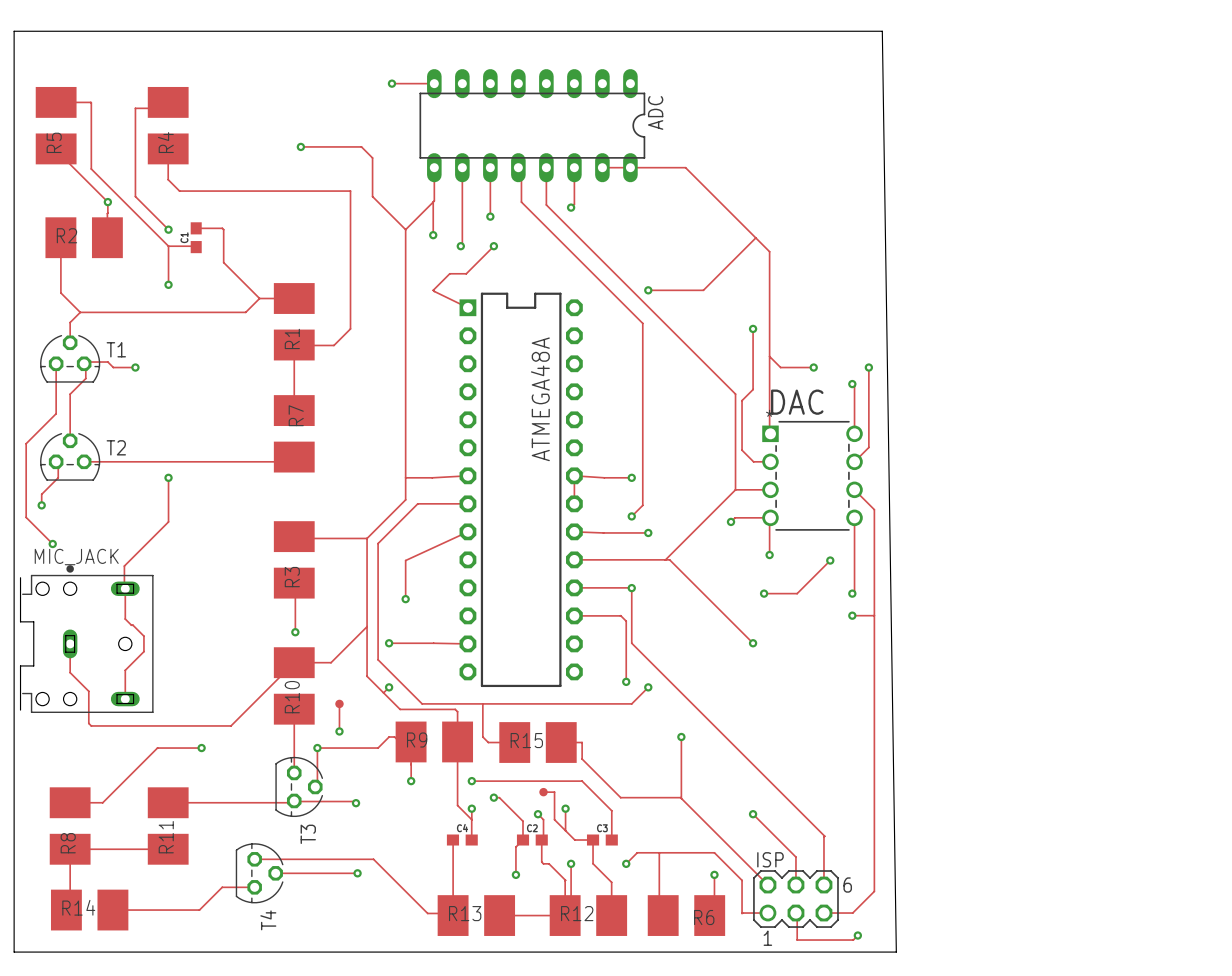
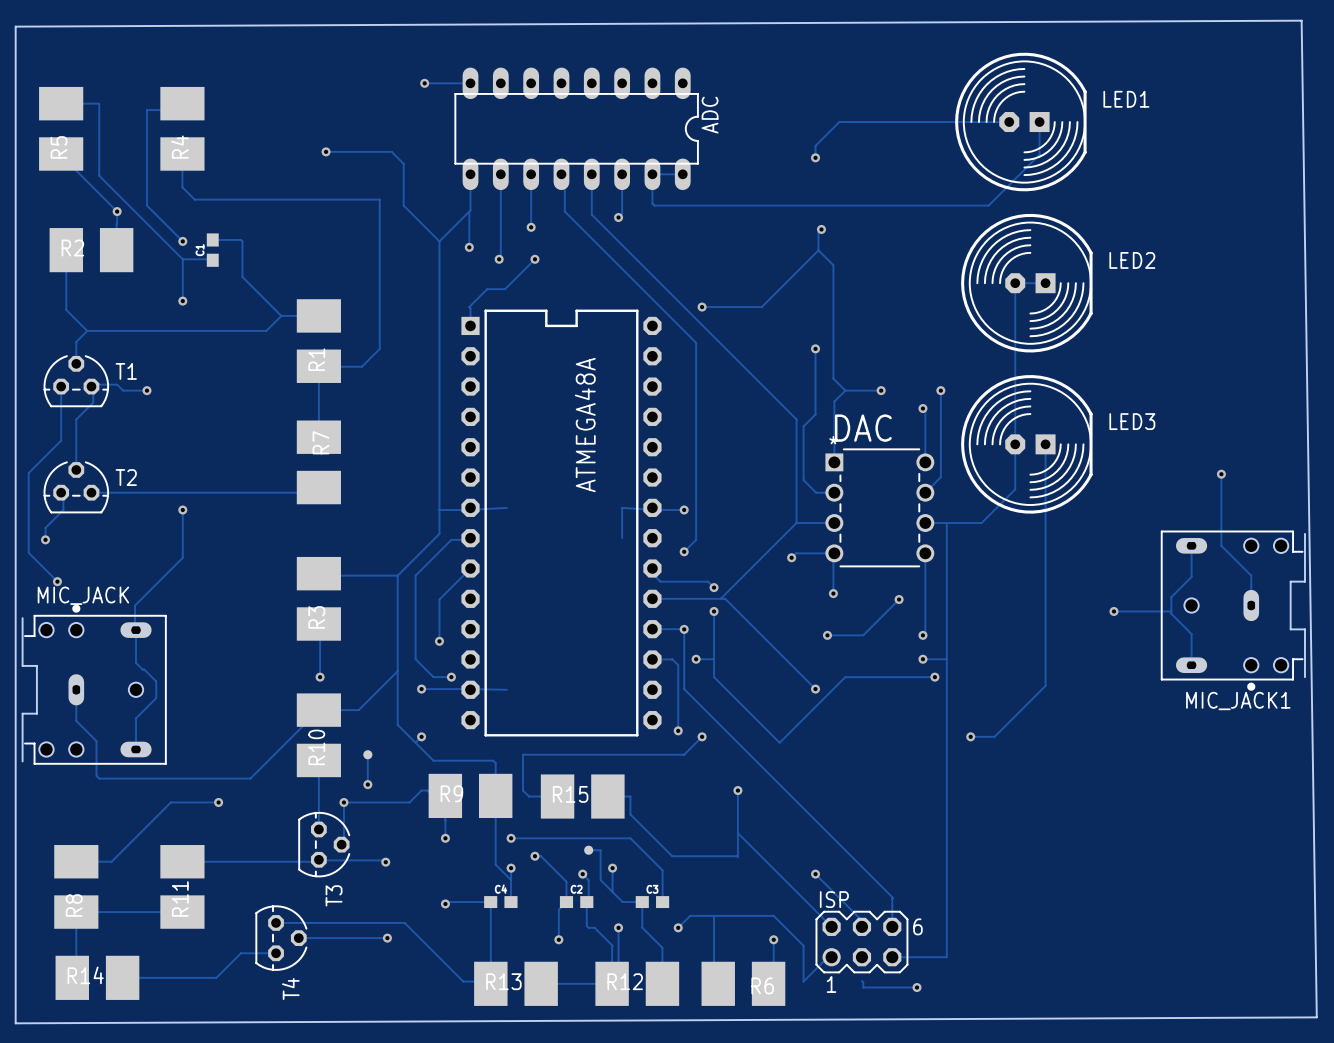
board edge: (14, 31) (882, 31) (896, 952) (14, 952) -> (15, 26) (1301, 20) (1316, 1017) (15, 1023)
track: none -> (1009, 122) (839, 122) (815, 145) (815, 157)
LED1: none -> (1020, 122)
track: none -> (1039, 122) (1039, 154) (988, 205) (654, 205) (652, 203) (652, 174)
via: none -> (815, 157)
track: (630, 167) (685, 167) (755, 237) -> (821, 229) (818, 232) (818, 250)
via: none -> (821, 229)
LED2: none -> (1026, 283)
track: none -> (1045, 283) (1015, 283) (1015, 489) (981, 523) (925, 523)
track: (434, 291) (467, 307) -> (470, 308) (470, 325)
ATMEGA48A footprint: [459, 292, 583, 688] -> [461, 309, 662, 737]
track: (769, 356) (770, 433) -> (845, 390) (834, 401) (834, 462)
LED3: none -> (1026, 444)
track: none -> (1045, 444) (1045, 685) (994, 736) (970, 736)
track: none -> (1221, 474) (1221, 545) (1251, 575) (1251, 605)
via: none -> (1221, 474)
track: (854, 489) (874, 509) -> (946, 523) (946, 544)
track: none -> (470, 538) (468, 539) (451, 539) (415, 575) (415, 659) (433, 677) (451, 677)
track: (467, 503) (417, 503) (378, 543) (378, 659) (422, 703) (482, 703) -> none
track: none -> (1191, 545) (1191, 576) (1171, 597) (1171, 613) (1191, 634) (1191, 665)
track: (467, 531) (405, 560) -> (470, 568) (439, 599)
track: (574, 531) (648, 532) -> none
track: none -> (652, 568) (652, 573) (660, 581) (708, 581) (714, 587)
via position: (648, 532) -> (714, 587)
track: (574, 559) (602, 559) -> none
MIC_JACK1: none -> (1232, 610)
track: none -> (714, 611) (714, 677) (779, 742) (845, 677) (934, 677)
via: none -> (714, 611)
track: none -> (1113, 611) (1171, 611)
via: none -> (1113, 611)
track: (574, 587) (602, 587) -> none
track: (574, 615) (602, 615) -> none
track: none -> (696, 659) (714, 659)
via: none -> (696, 659)
via: none -> (451, 677)
via: none -> (934, 677)
via: none -> (970, 736)
track: (681, 798) (767, 885) -> (737, 833) (831, 926)
track: none -> (490, 902) (447, 902) (445, 903)
via: none -> (445, 903)
track: (795, 862) (795, 885) -> none
track: (823, 862) (823, 885) -> none
track: (874, 890) (852, 913) (823, 913) -> (946, 957) (892, 957)
ISP position: (795, 899) -> (861, 942)
track: (742, 913) (767, 913) -> (804, 981) (827, 957) (831, 957)
track: (797, 918) (797, 940) (853, 940) (857, 935) -> (863, 987) (916, 987)
via position: (857, 935) -> (916, 987)

